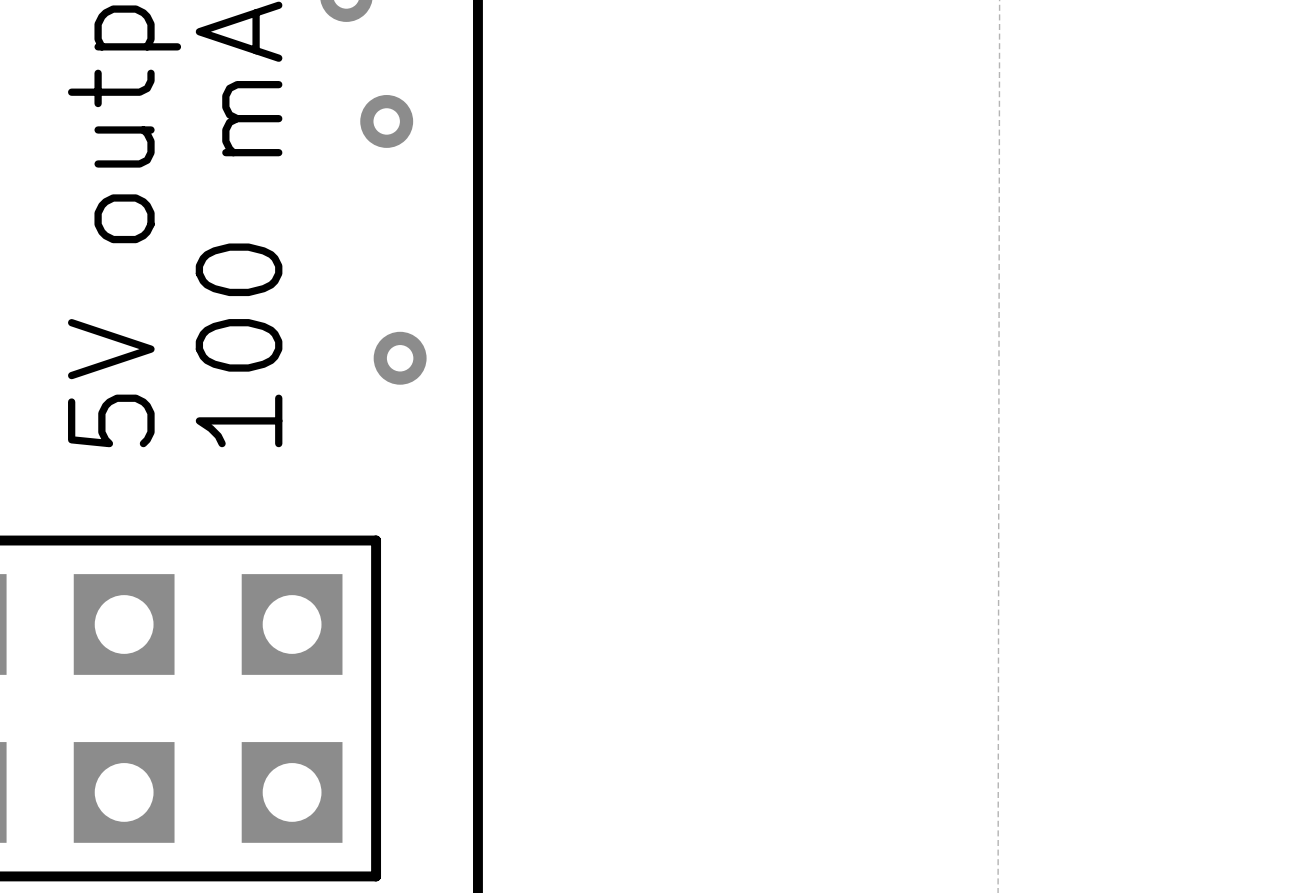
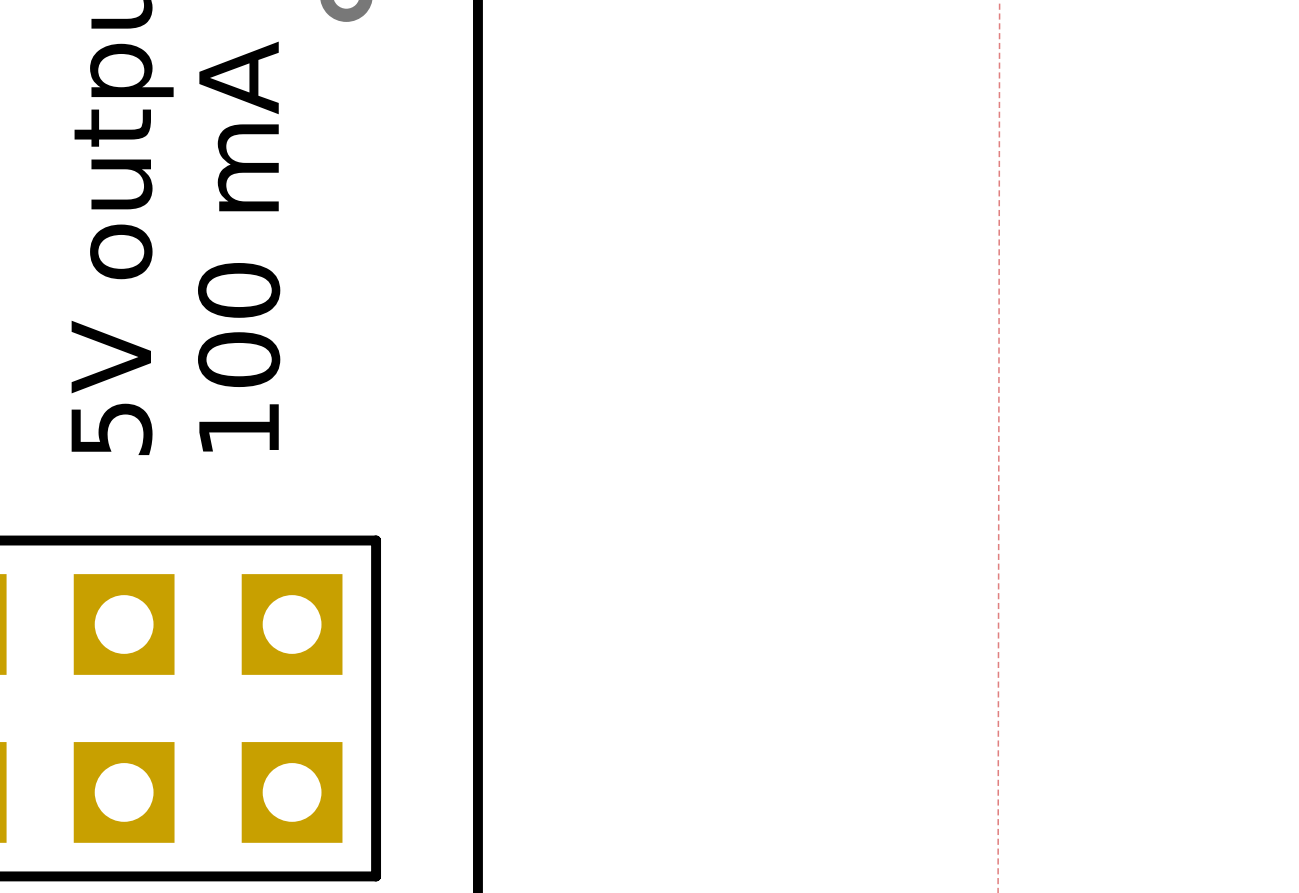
via: (386, 121) -> none
via: (400, 358) -> none

